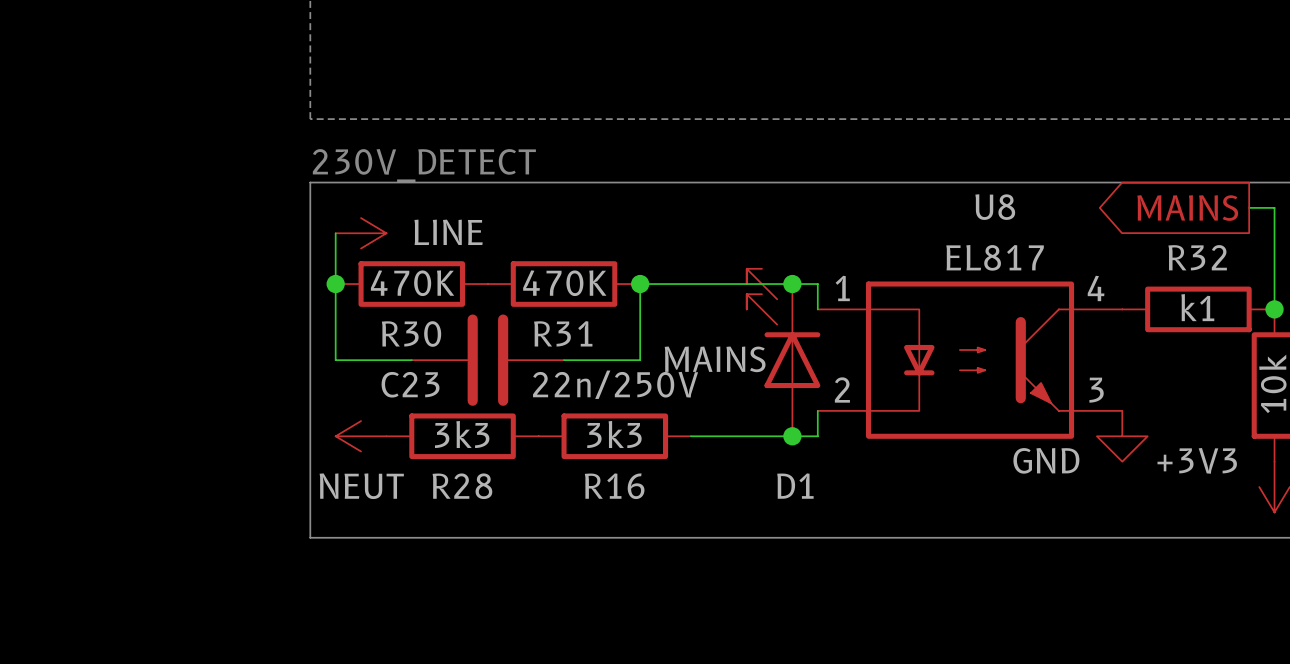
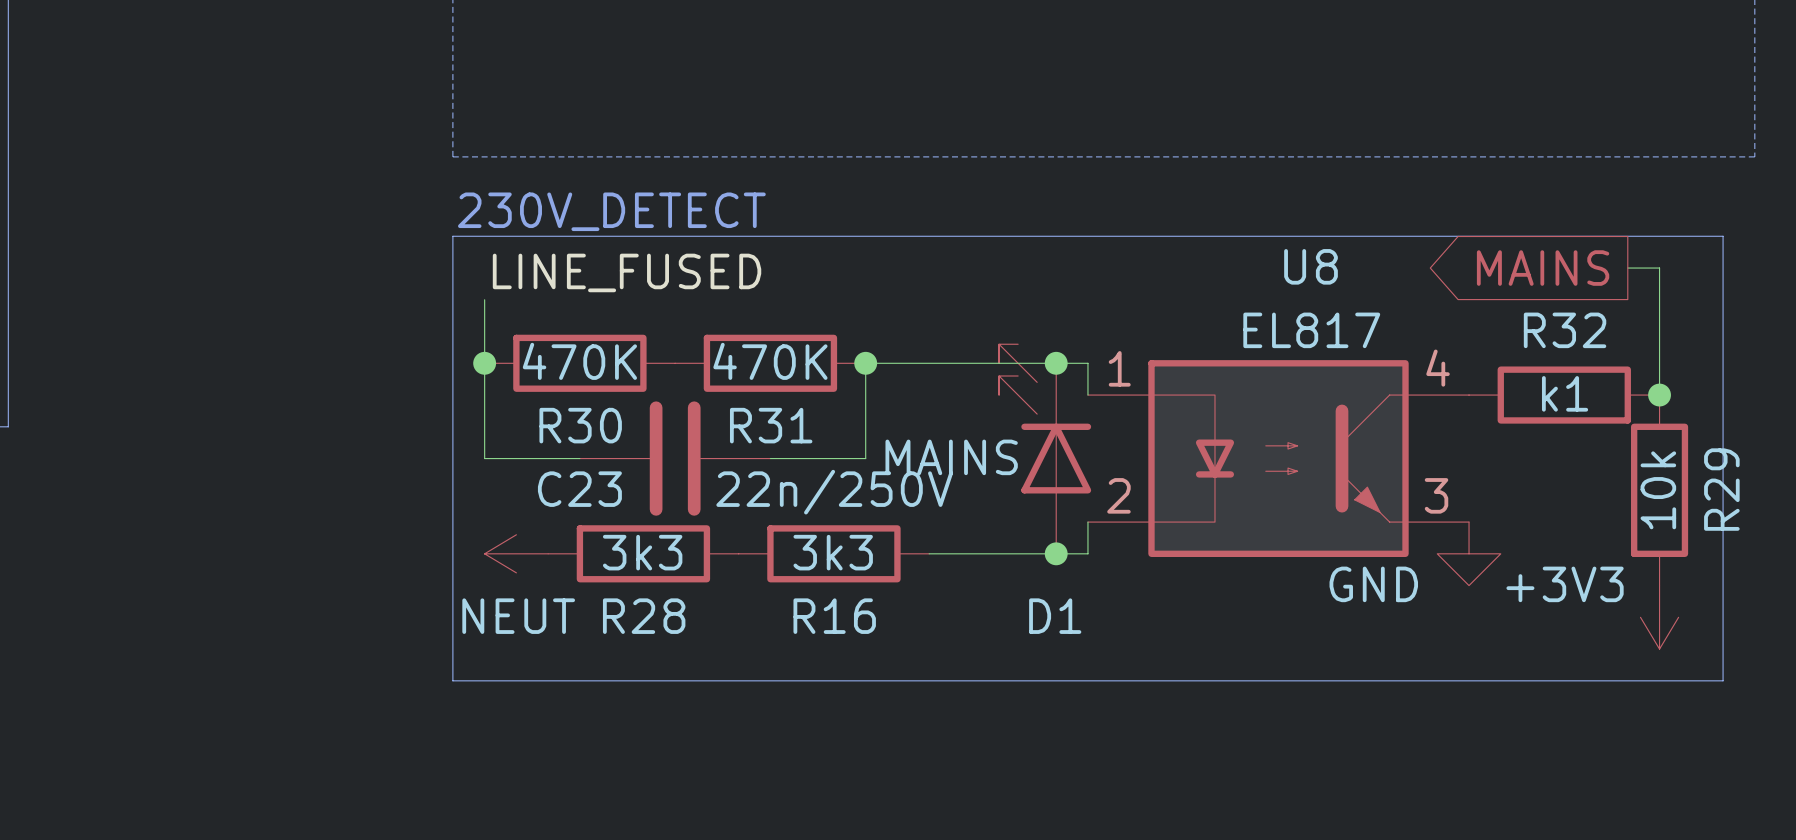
label: none -> LINE_FUSED (627, 272)
power symbol: LINE (361, 233) -> none

